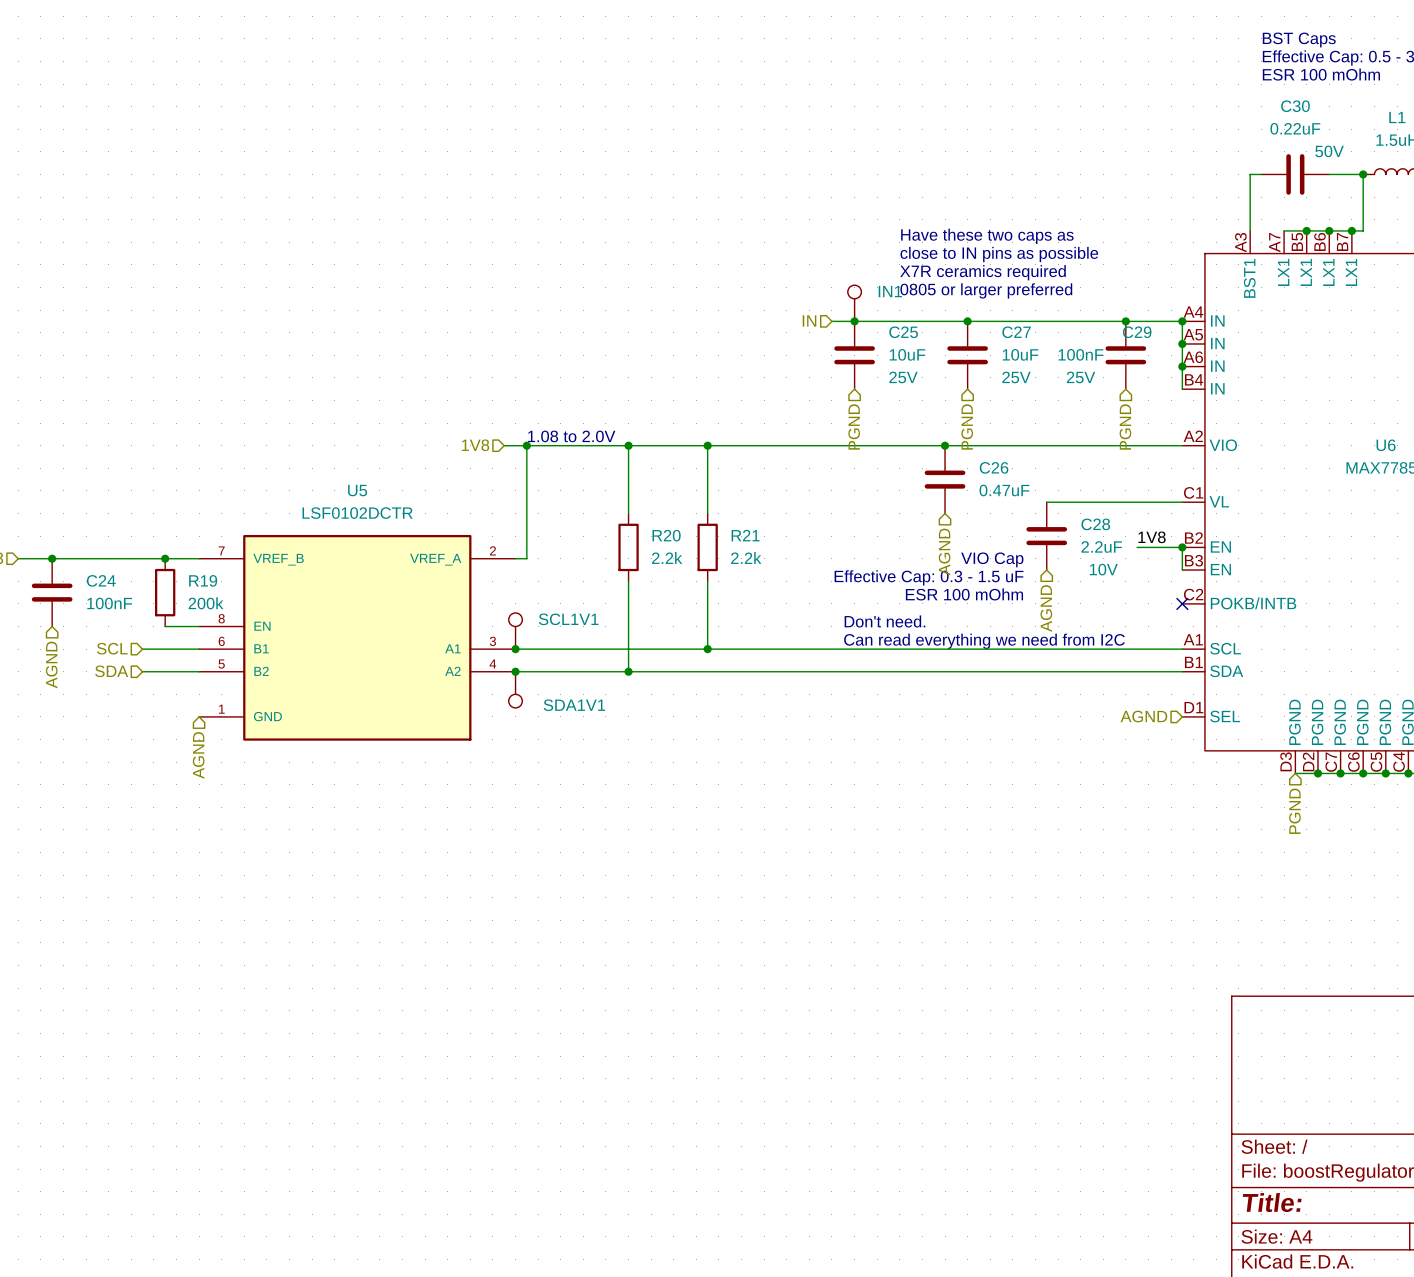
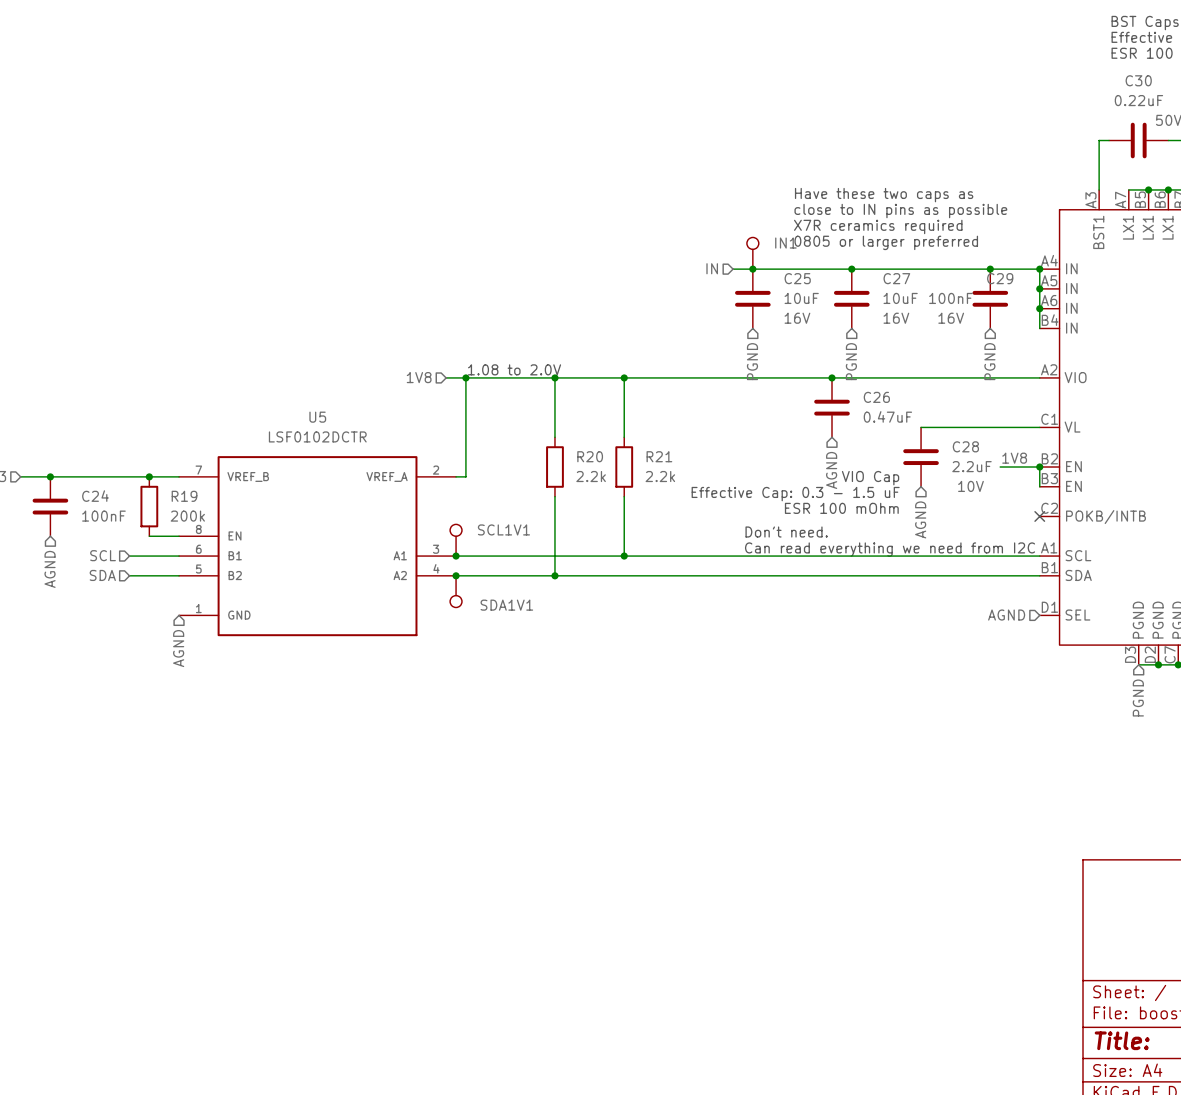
C25 text: 25V (903, 377) -> 16V (797, 318)
C27 text: 25V (1016, 377) -> 16V (896, 318)
C29 text: 25V (1081, 377) -> 16V (951, 318)

